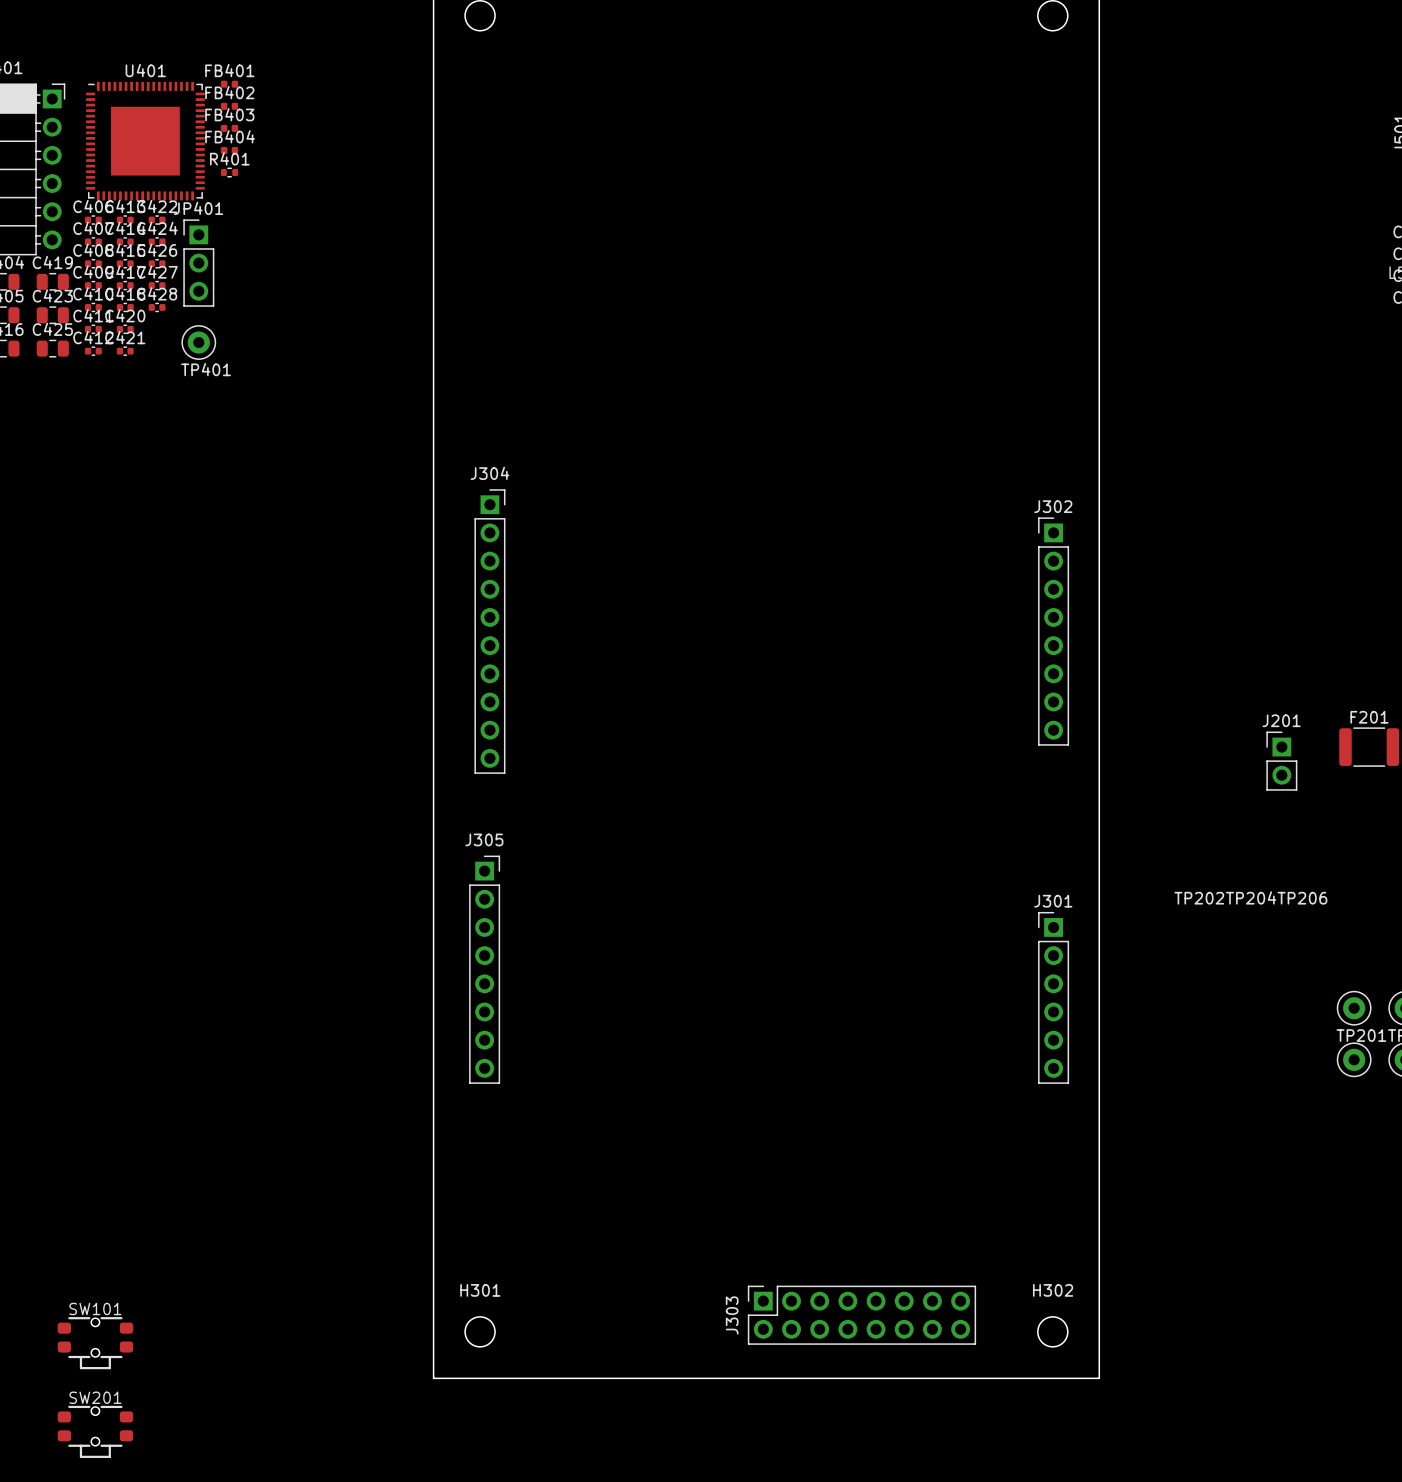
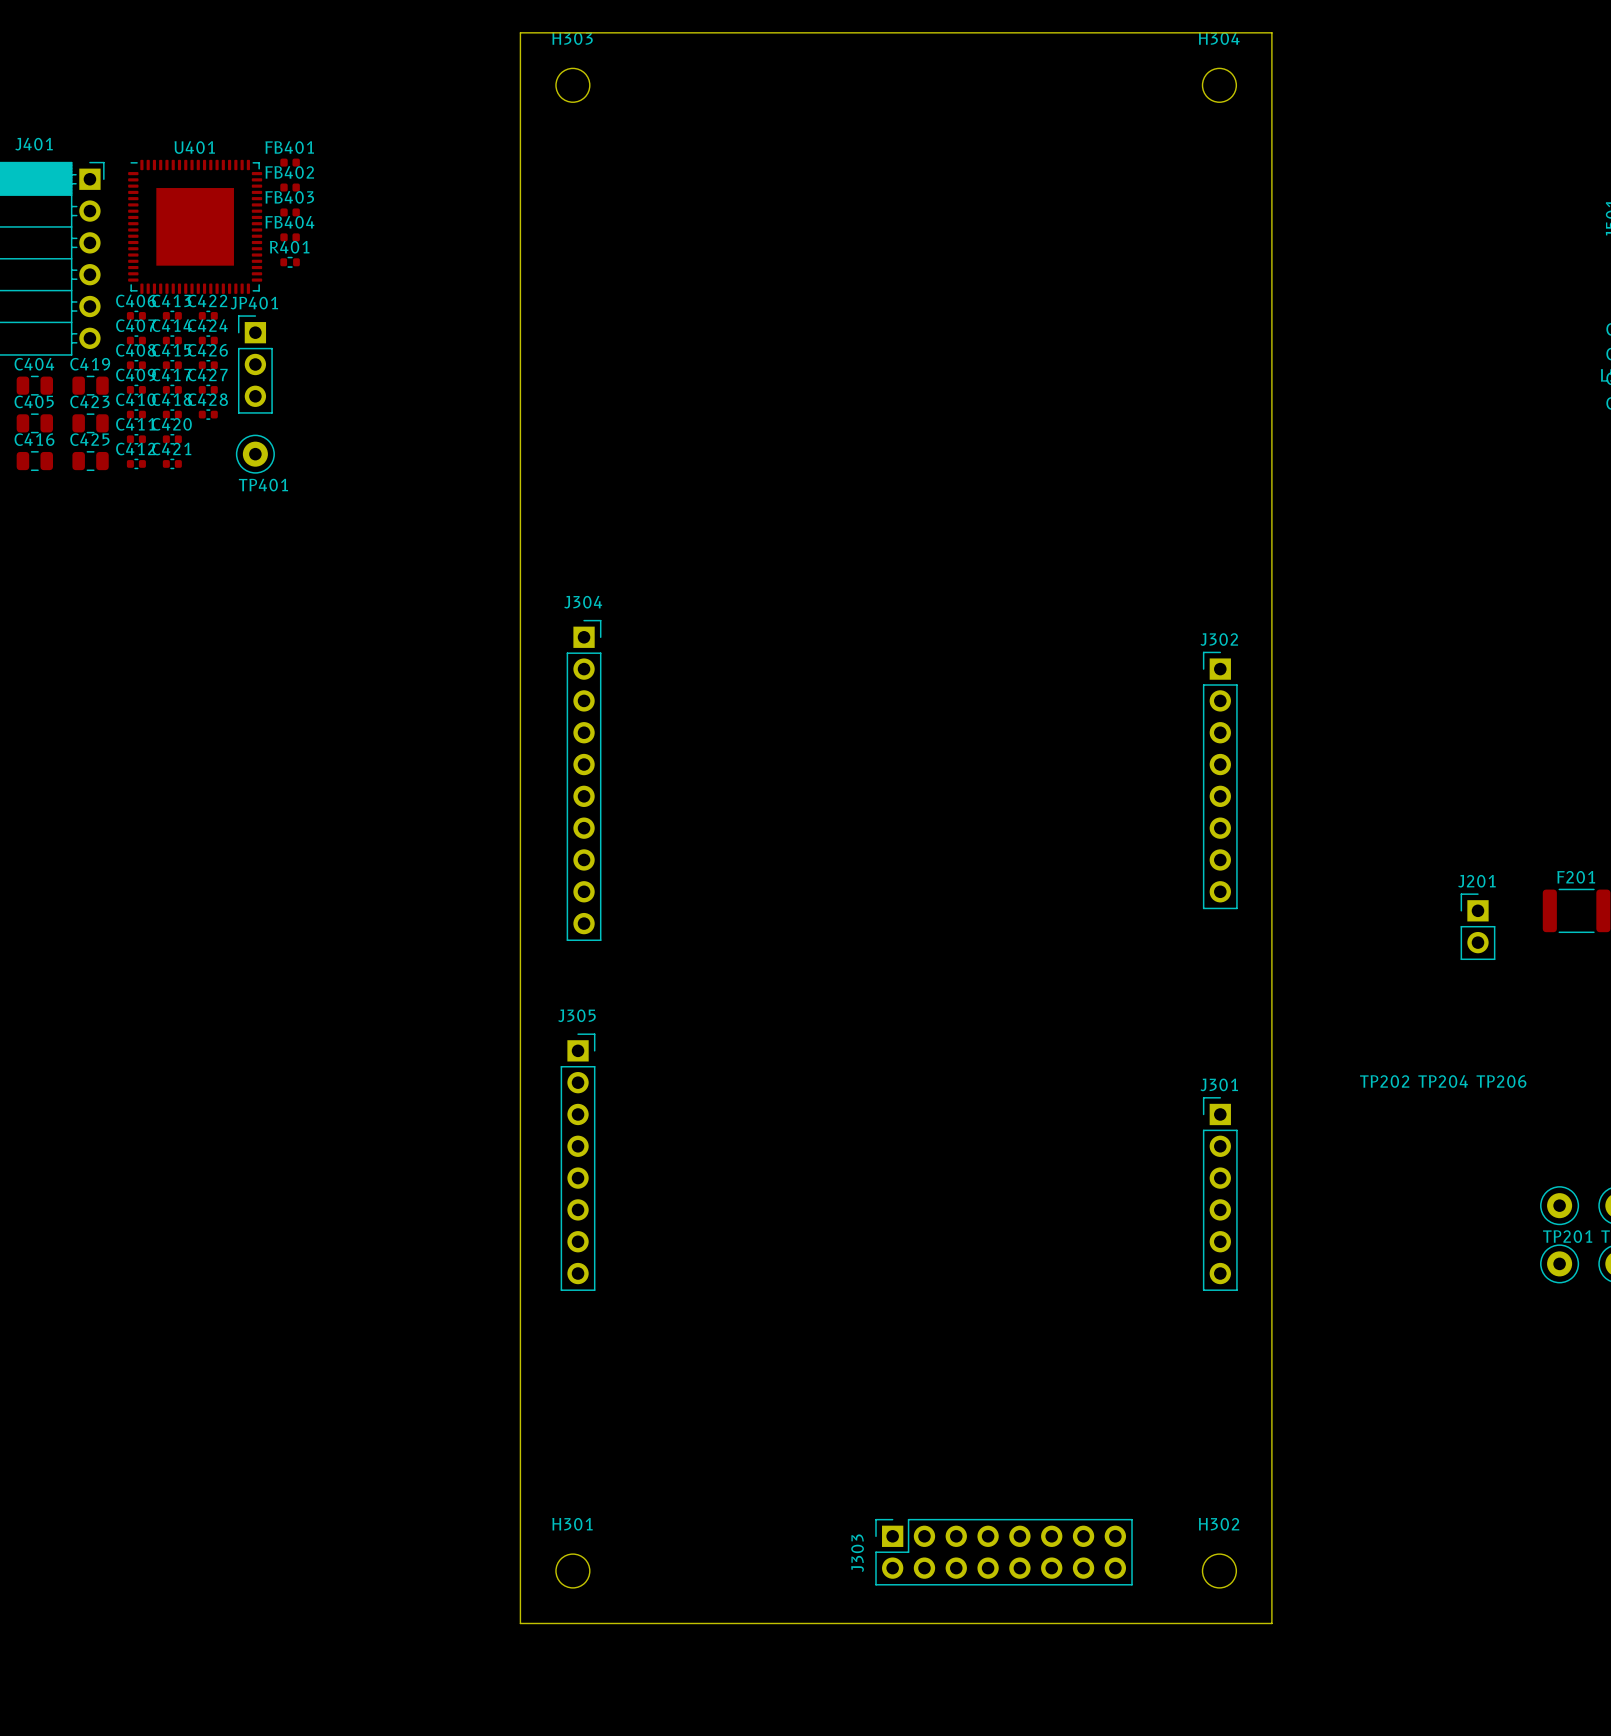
SW101: (95, 1343) -> none
SW201: (95, 1431) -> none

